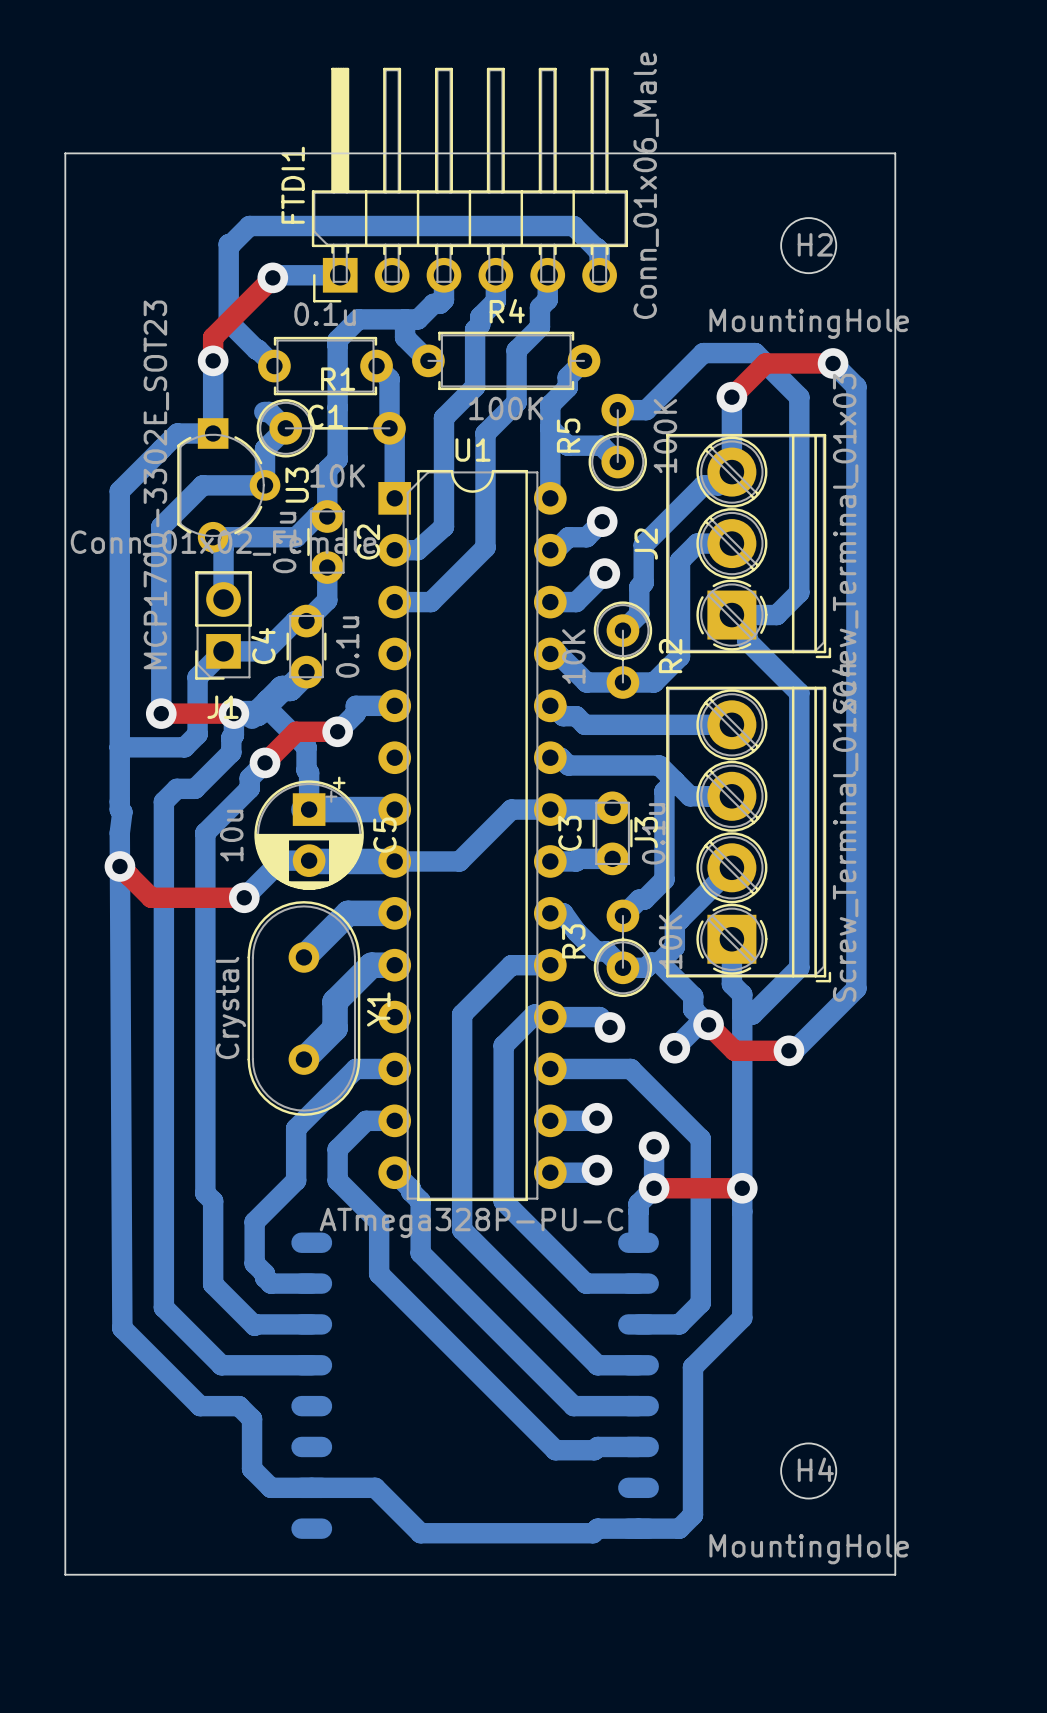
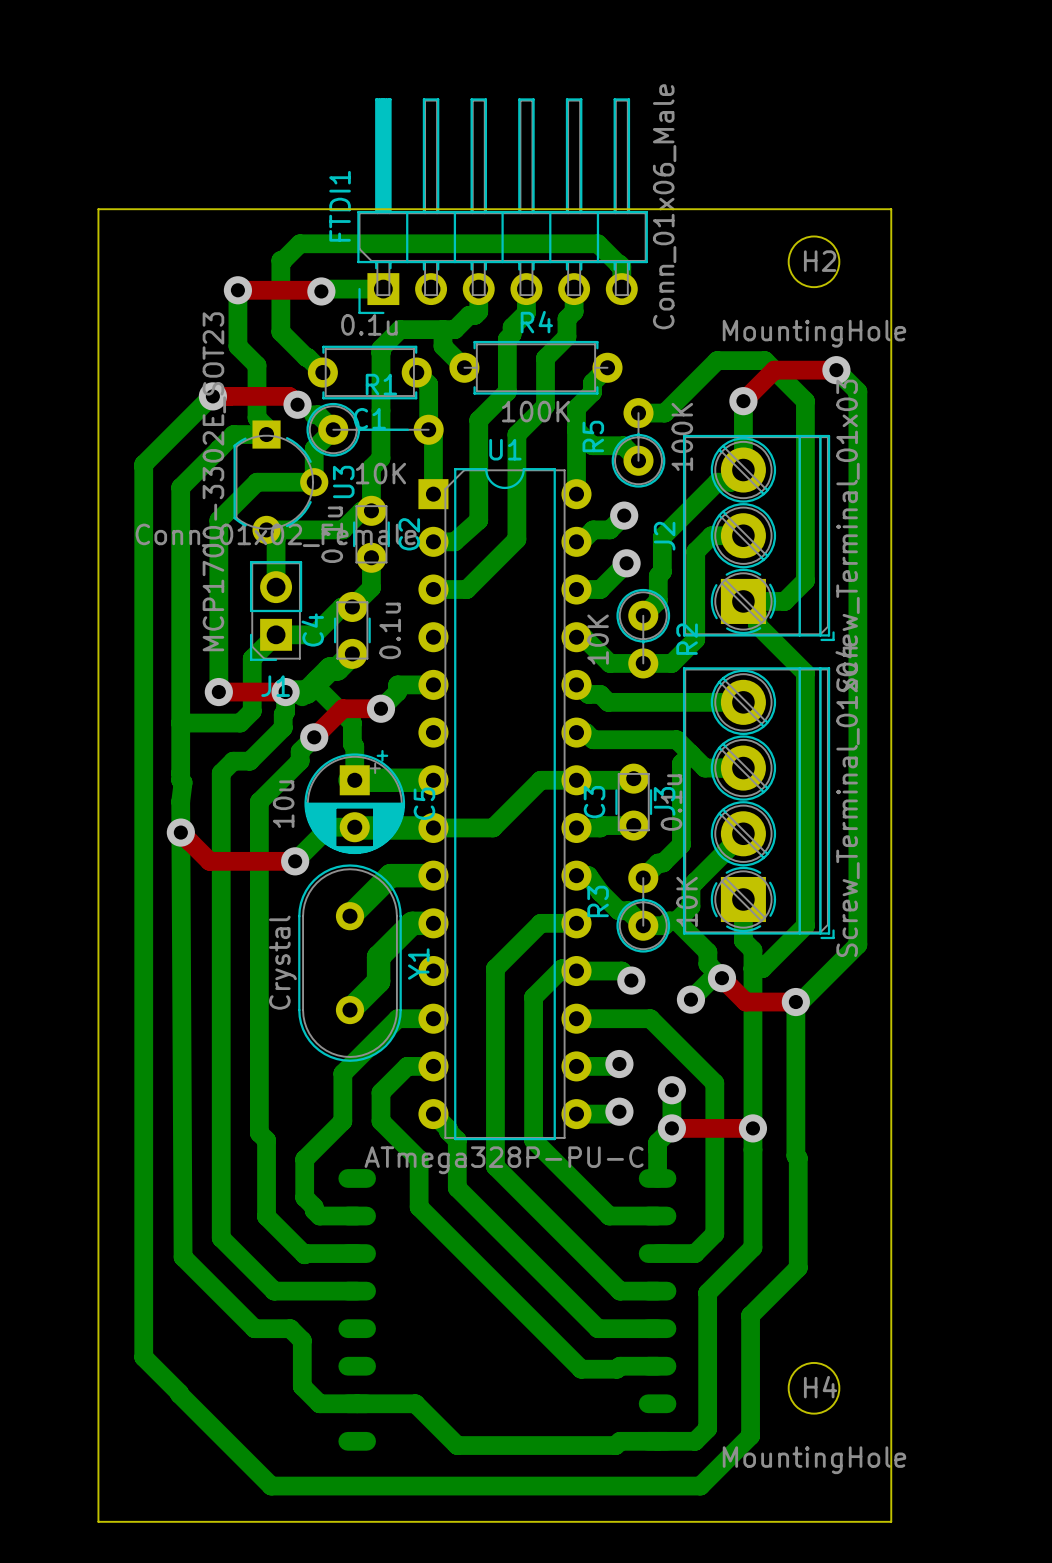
board edge: (65, 153) (895, 153) (895, 1574) (65, 1574) (65, 153) -> (98, 209) (98, 1521) (891, 1521) (891, 209) (98, 209)
via: none -> (237, 290)
top track: (272, 277) (213, 337) (213, 360) -> (321, 291) (237, 290)
bottom track: (213, 360) (213, 425) -> (237, 290) (237, 346) (257, 365) (257, 417) (266, 427)
via: (213, 360) -> none
bottom track: none -> (211, 396) (143, 464) (143, 1357) (271, 1486) (700, 1486) (750, 1435) (750, 1315) (798, 1267) (795, 1002)
top track: none -> (212, 396) (289, 396) (297, 404)
via: none -> (212, 396)
via: none -> (297, 404)

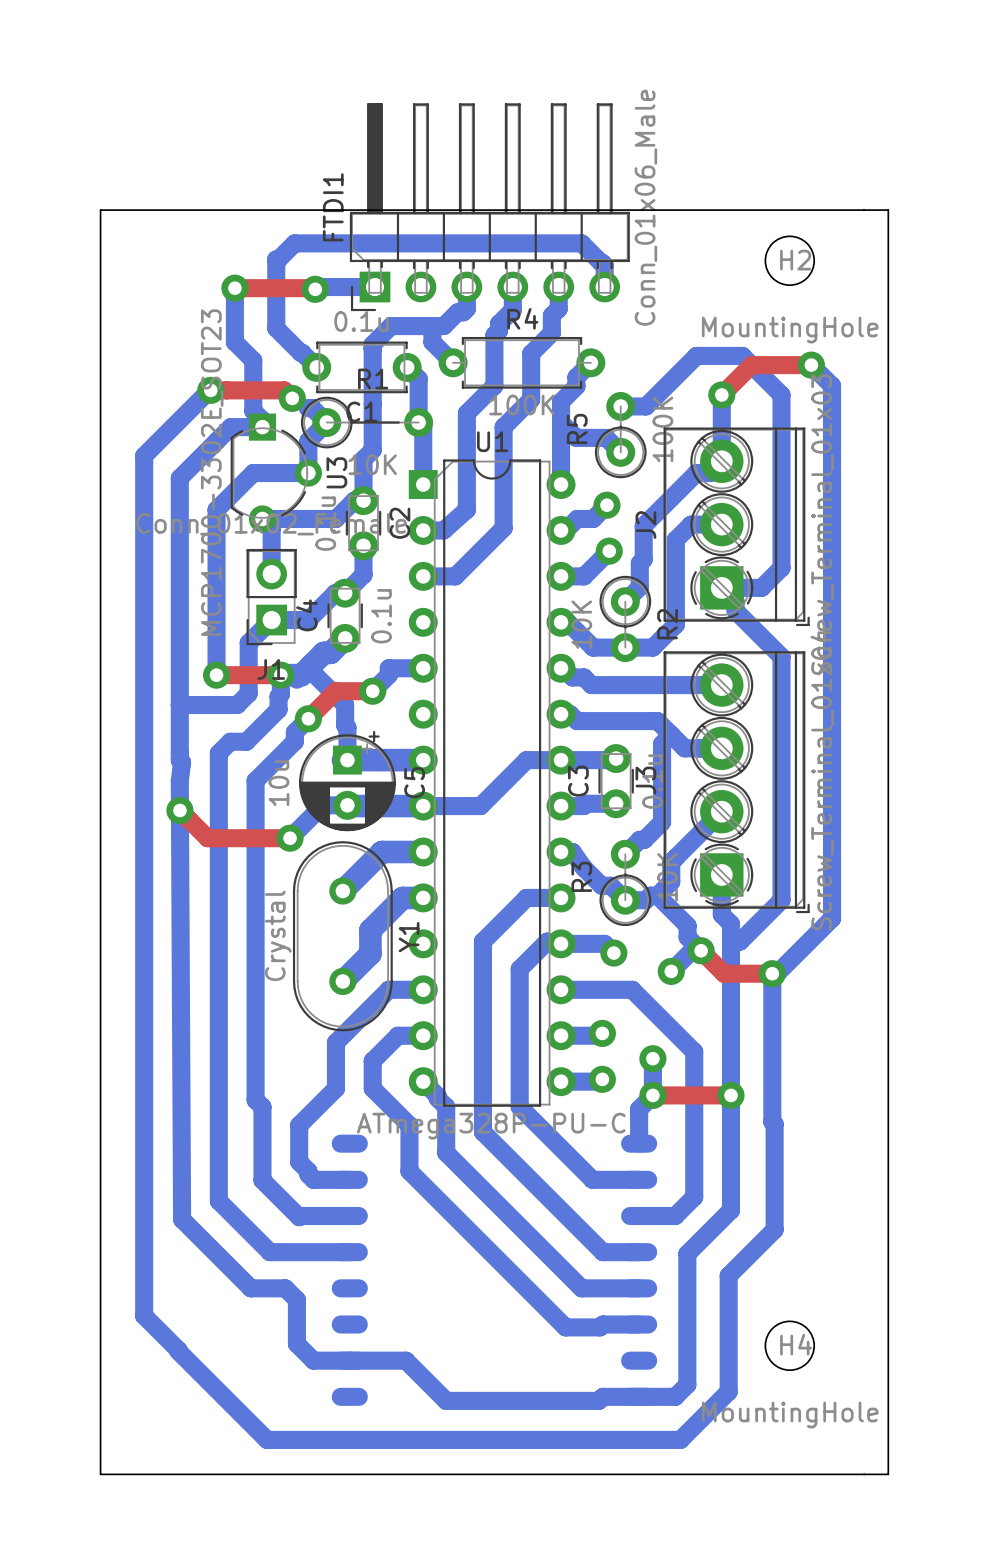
board edge: (891, 209) (891, 1521) -> (864, 210) (888, 210) (888, 1474) (864, 1474)

